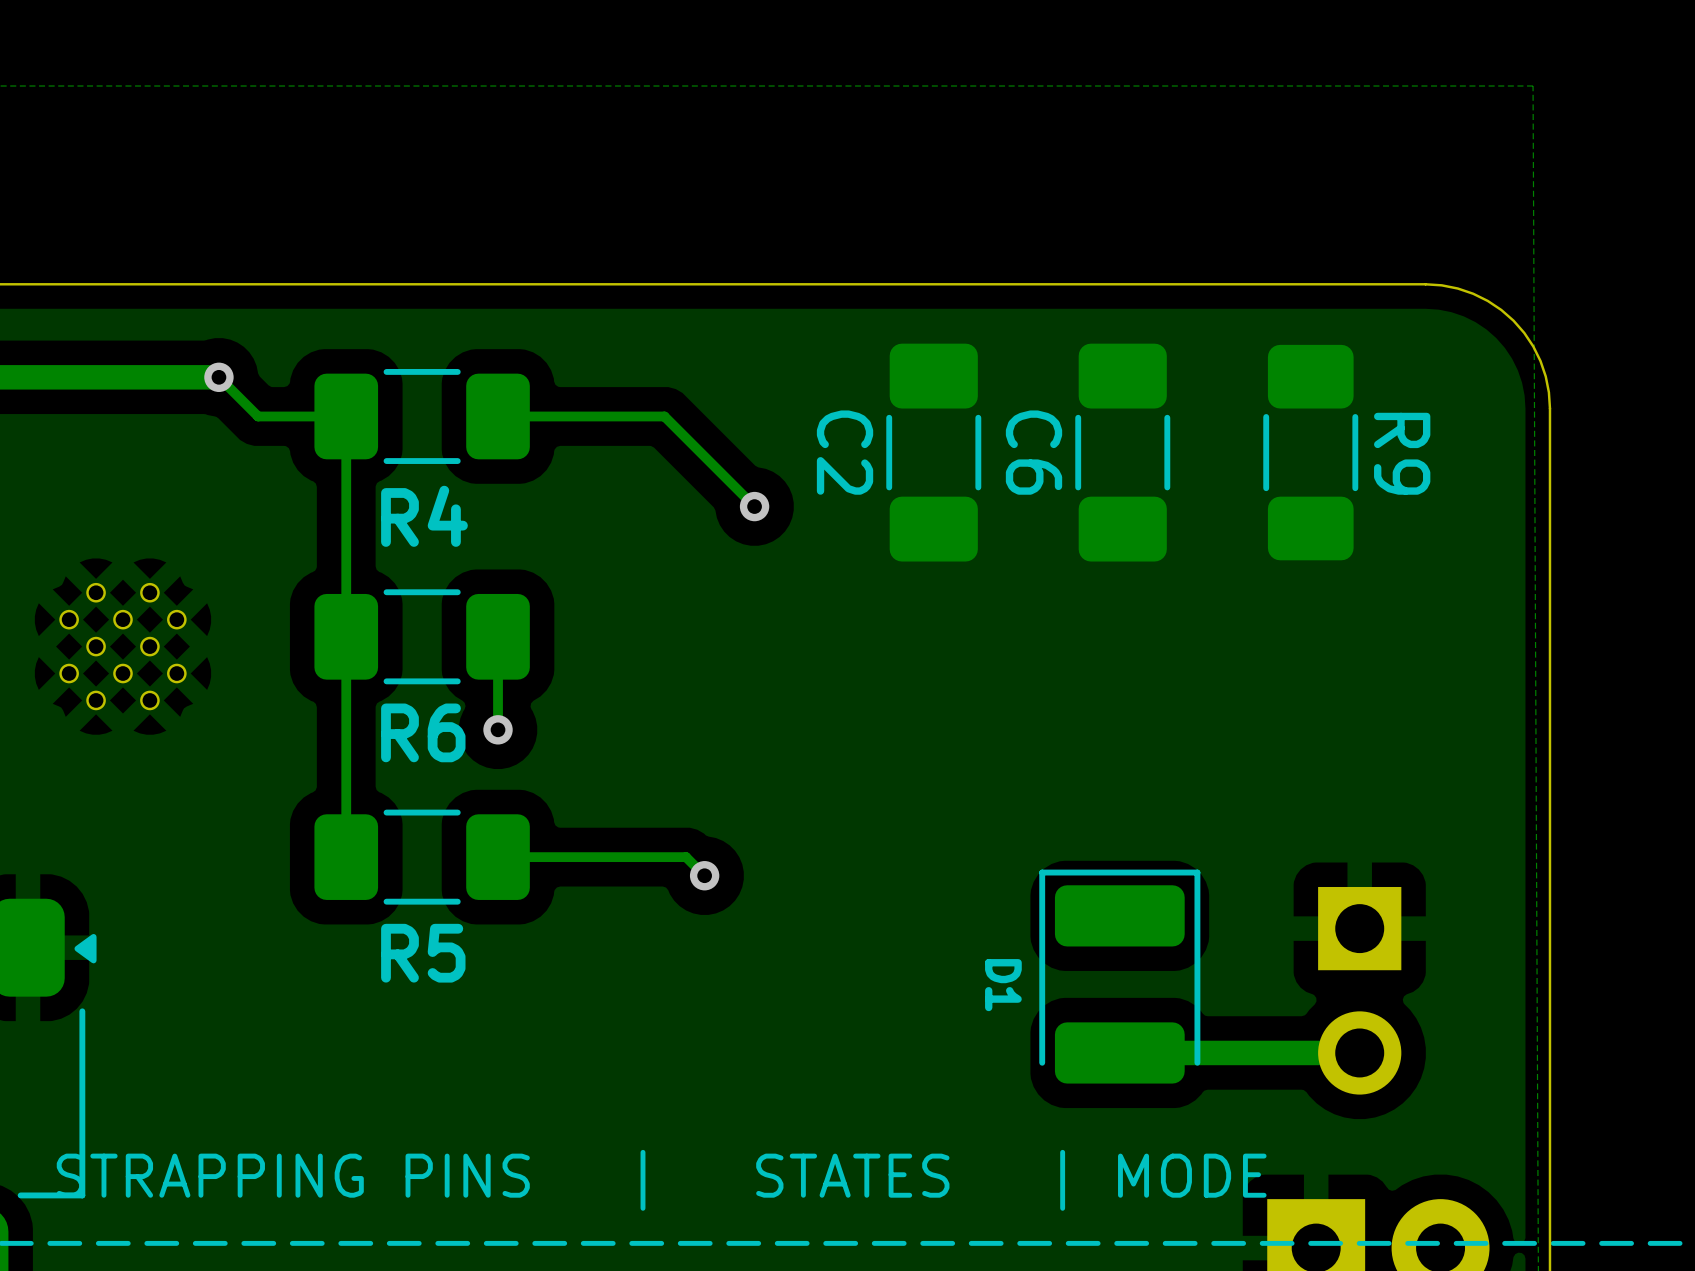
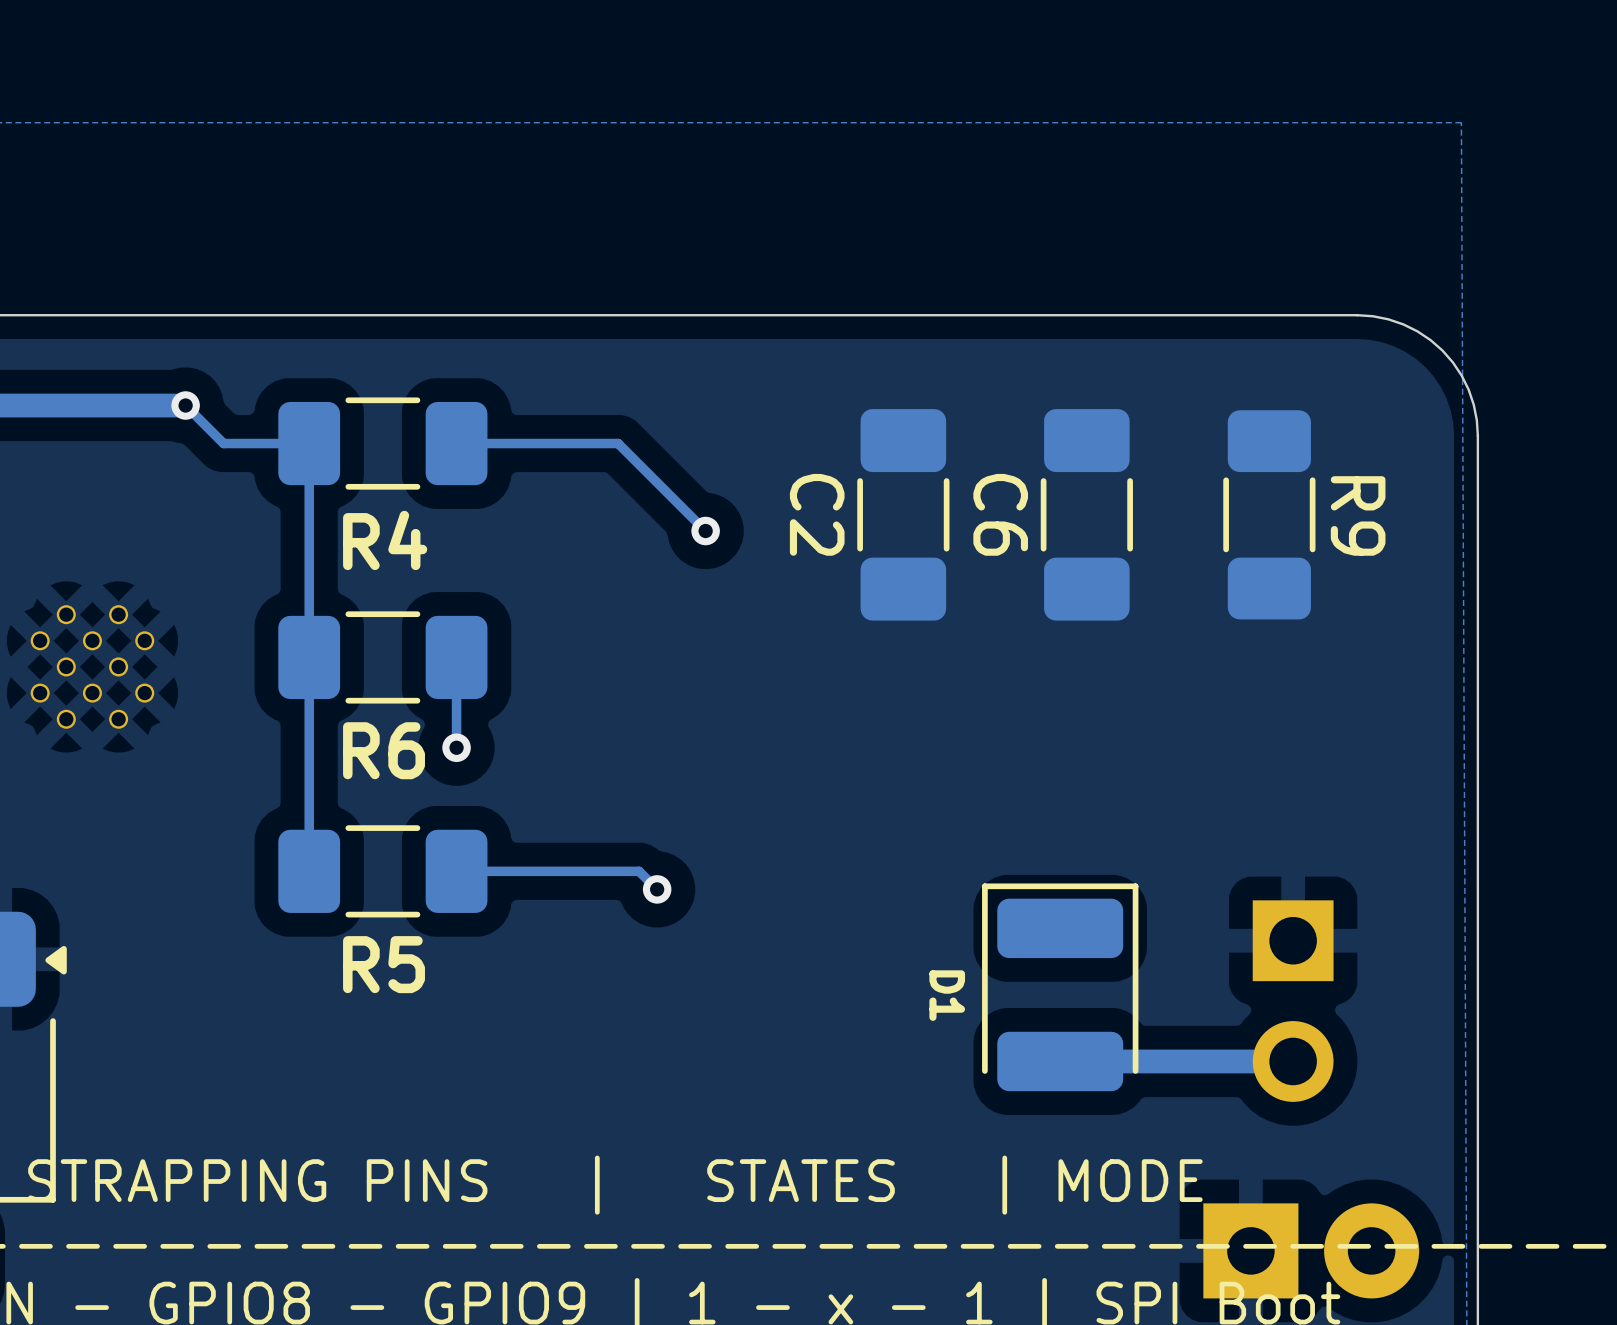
C2 position: (933, 452) -> (903, 514)
C6 position: (1122, 452) -> (1086, 514)
R9 position: (1310, 452) -> (1269, 514)

